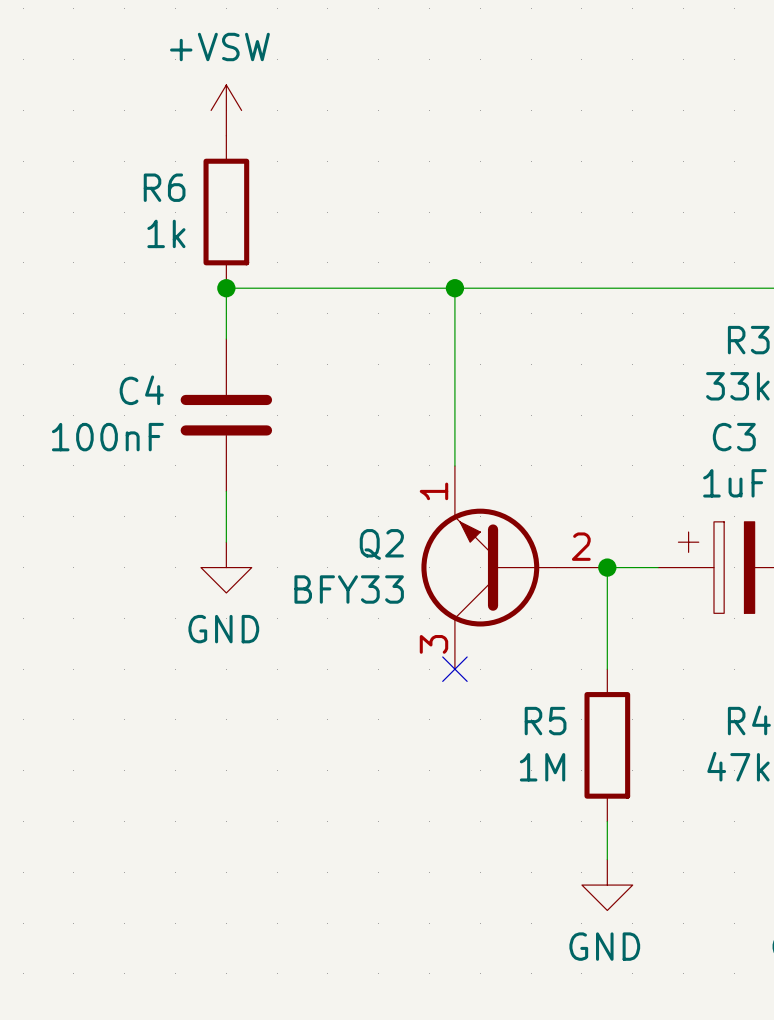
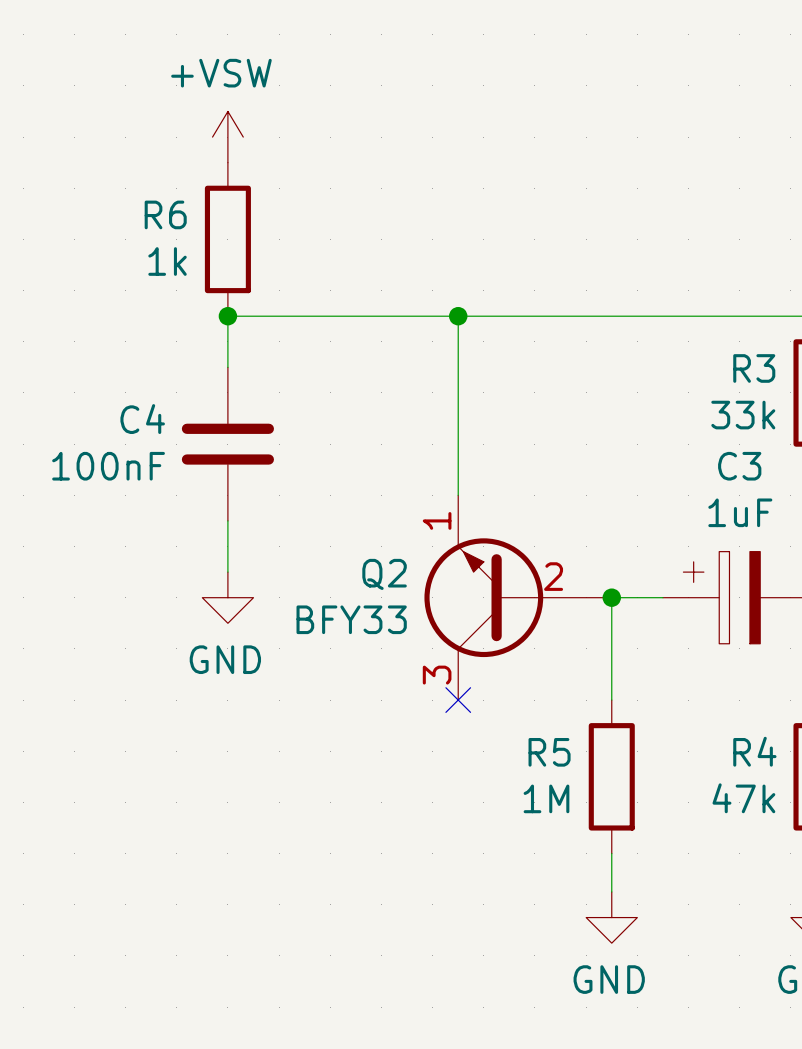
Q2 symbol: [421, 465, 608, 670] -> [424, 495, 612, 701]

